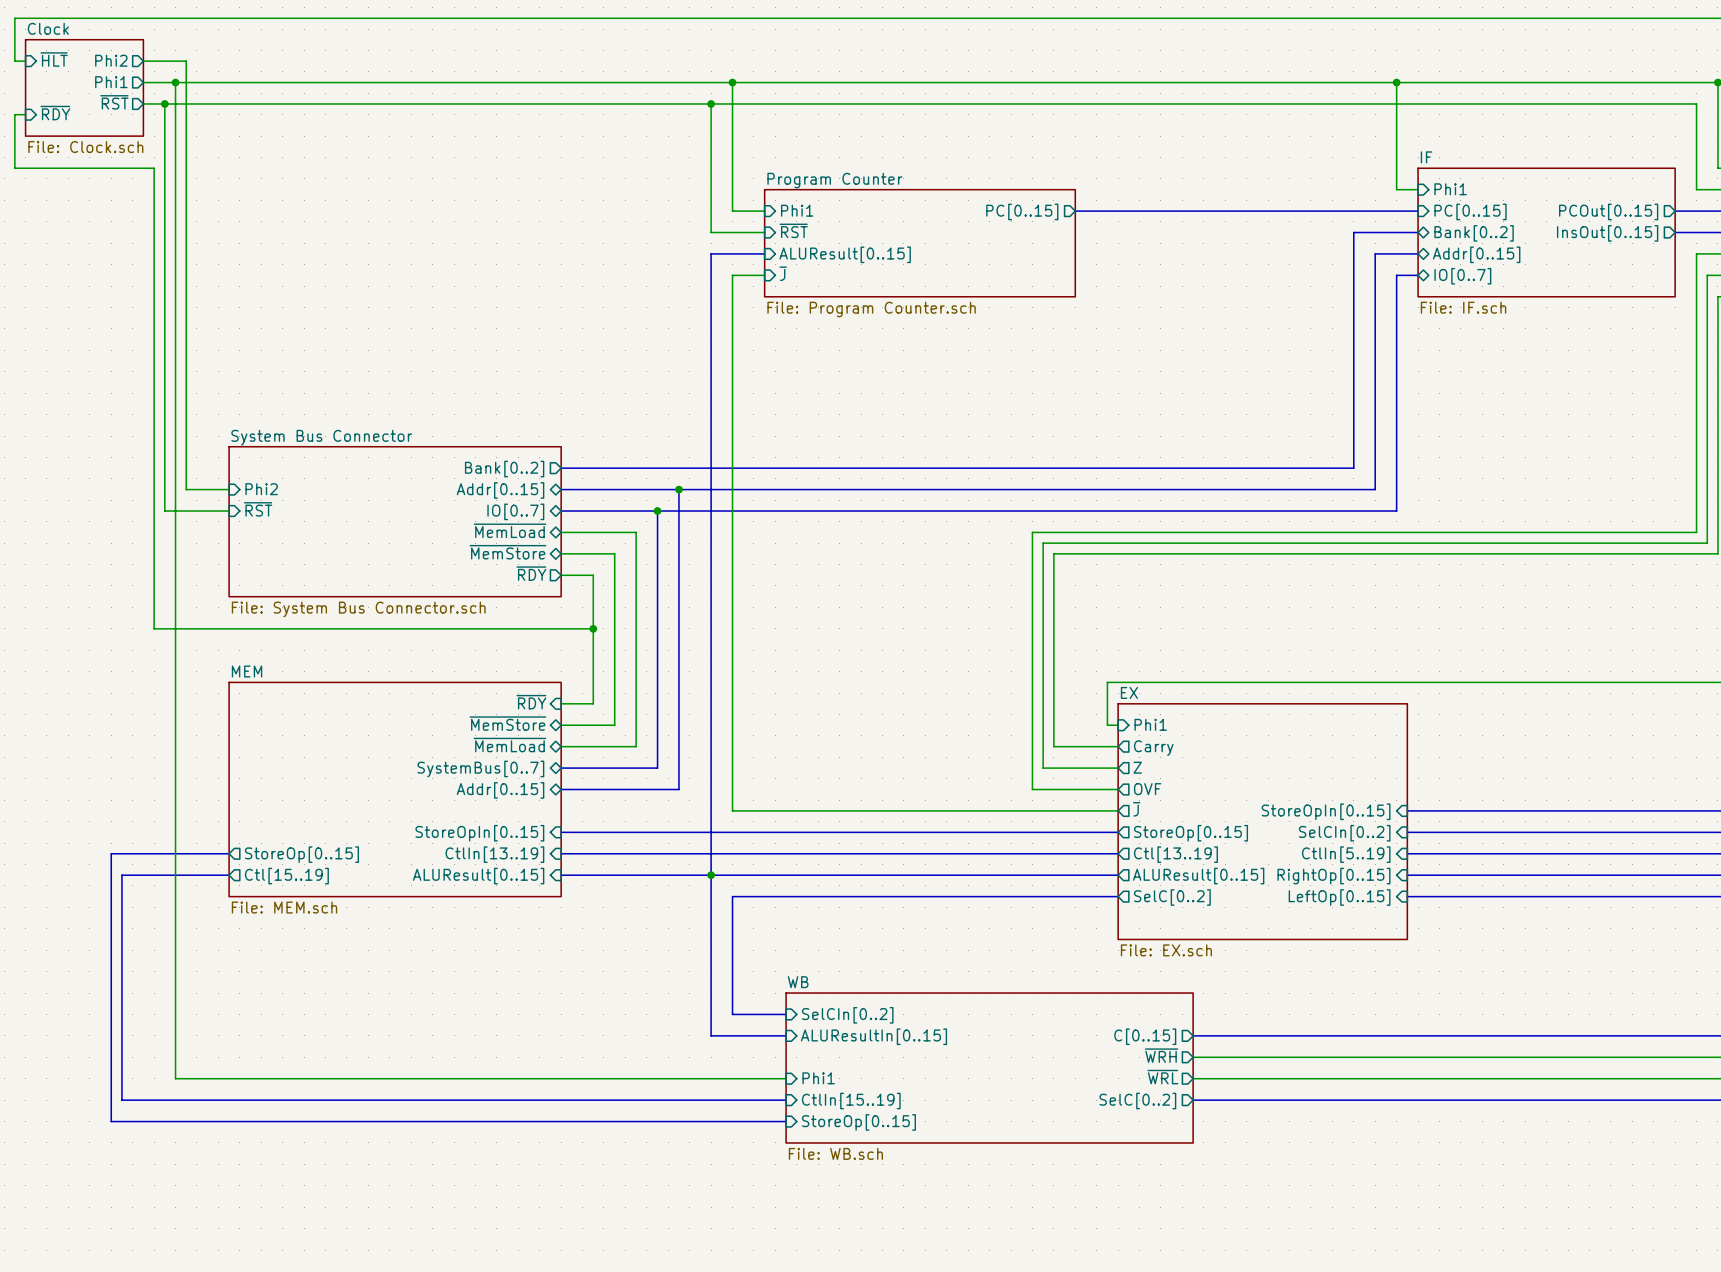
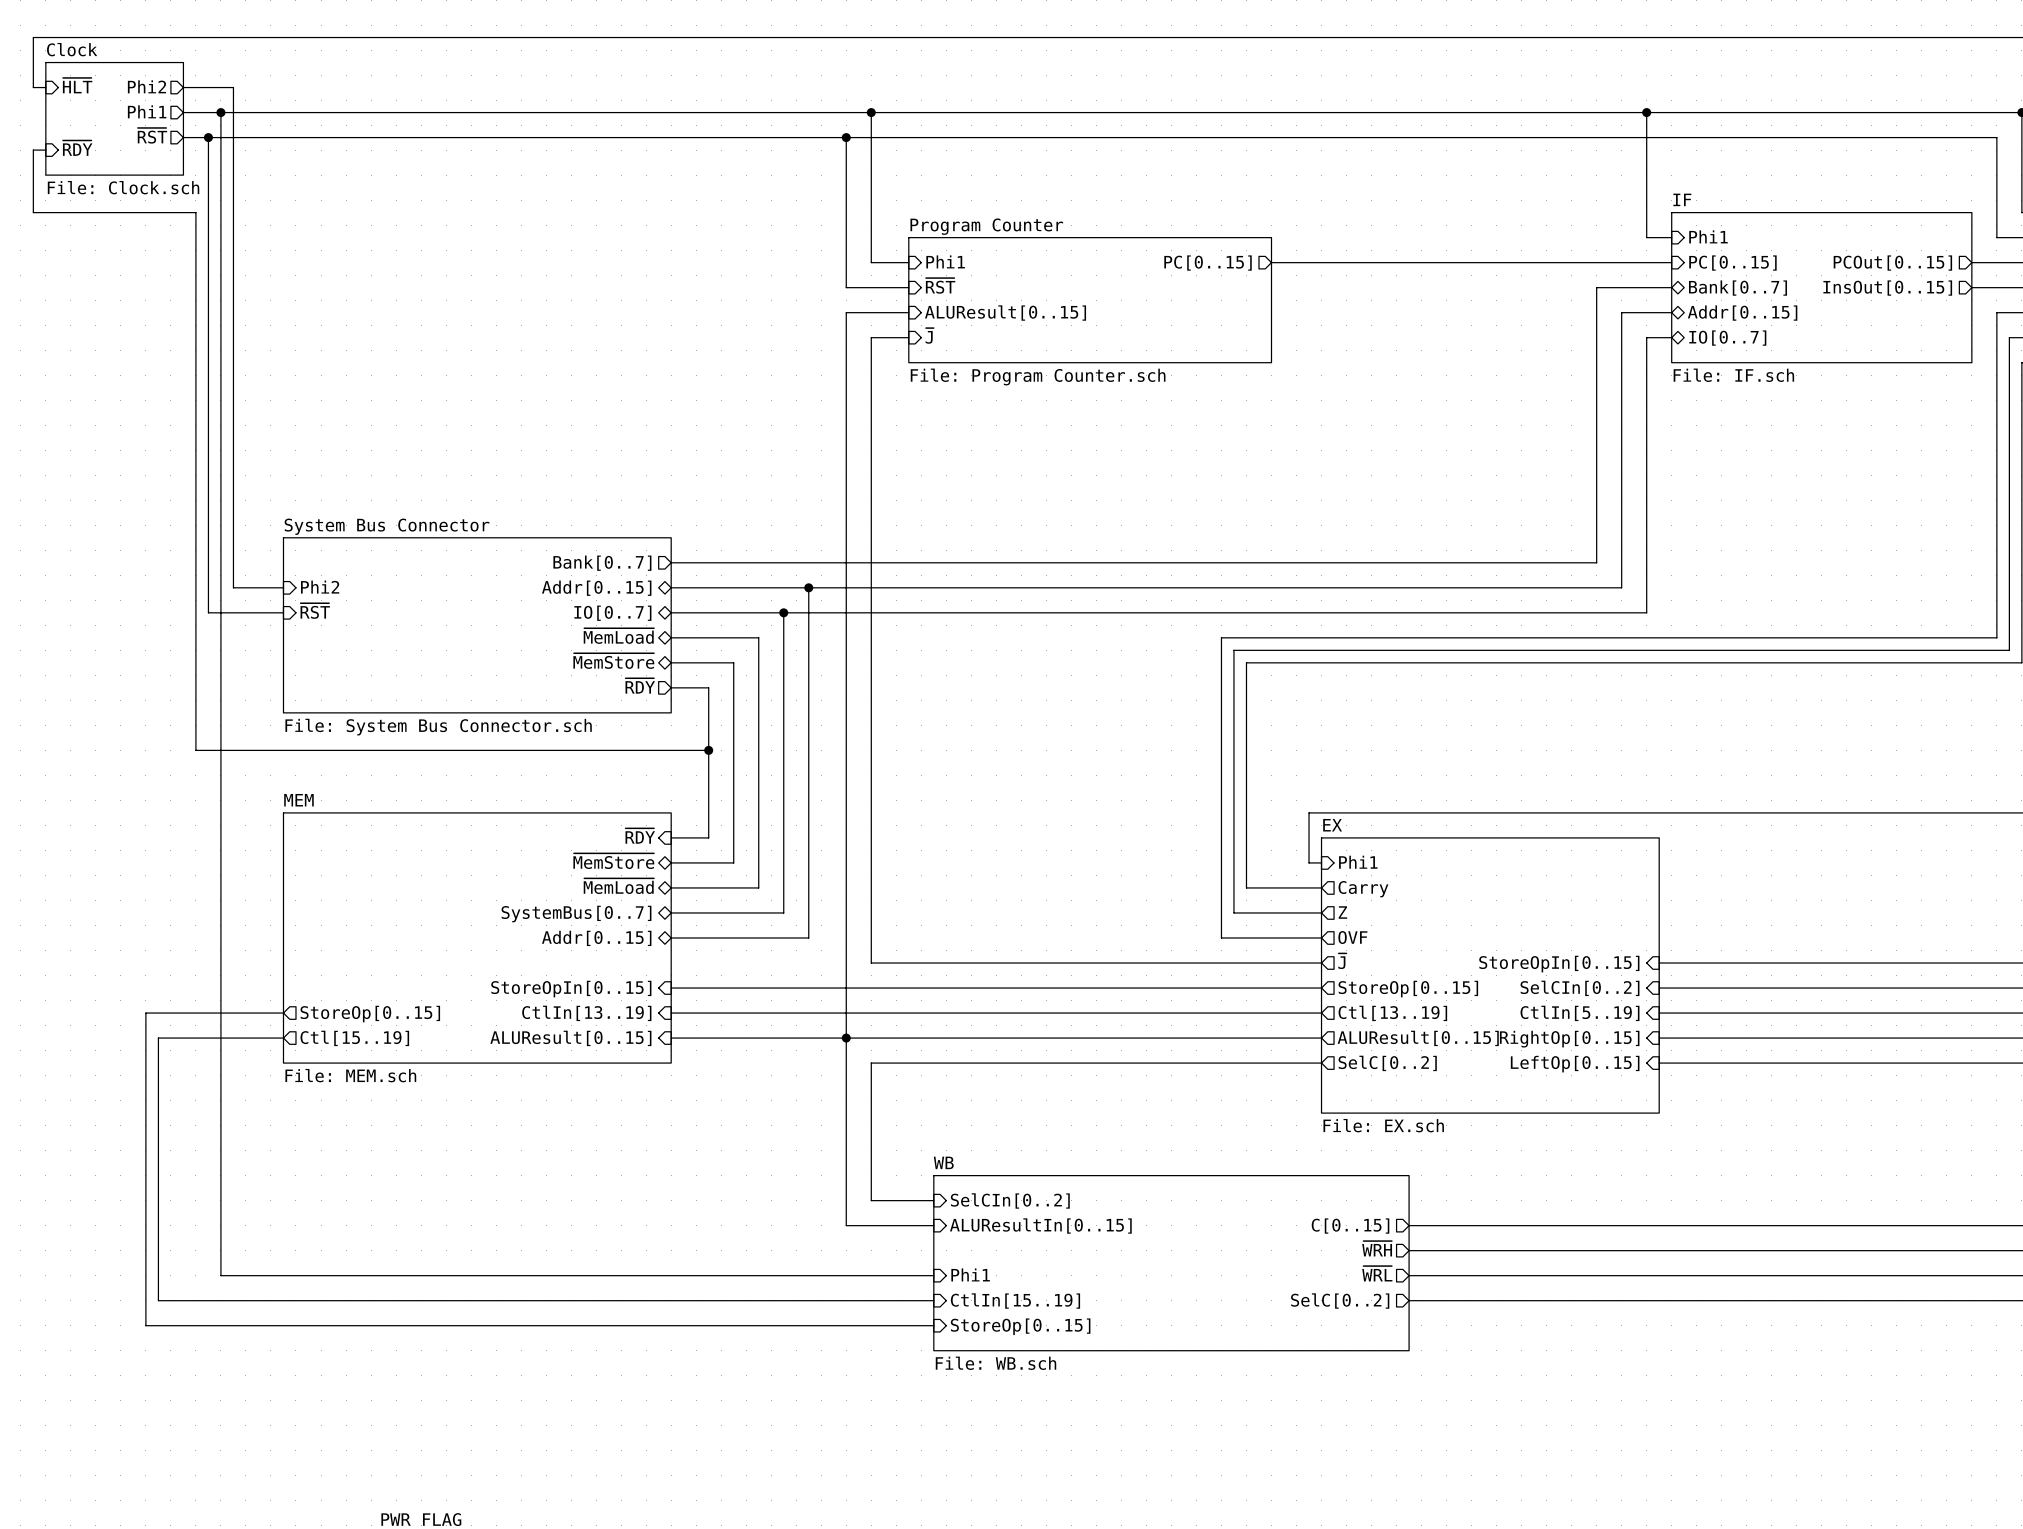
sheet pin: Bank[0..2] (1474, 233) -> Bank[0..7] (1737, 288)
sheet pin: Bank[0..2] (504, 469) -> Bank[0..7] (602, 563)

